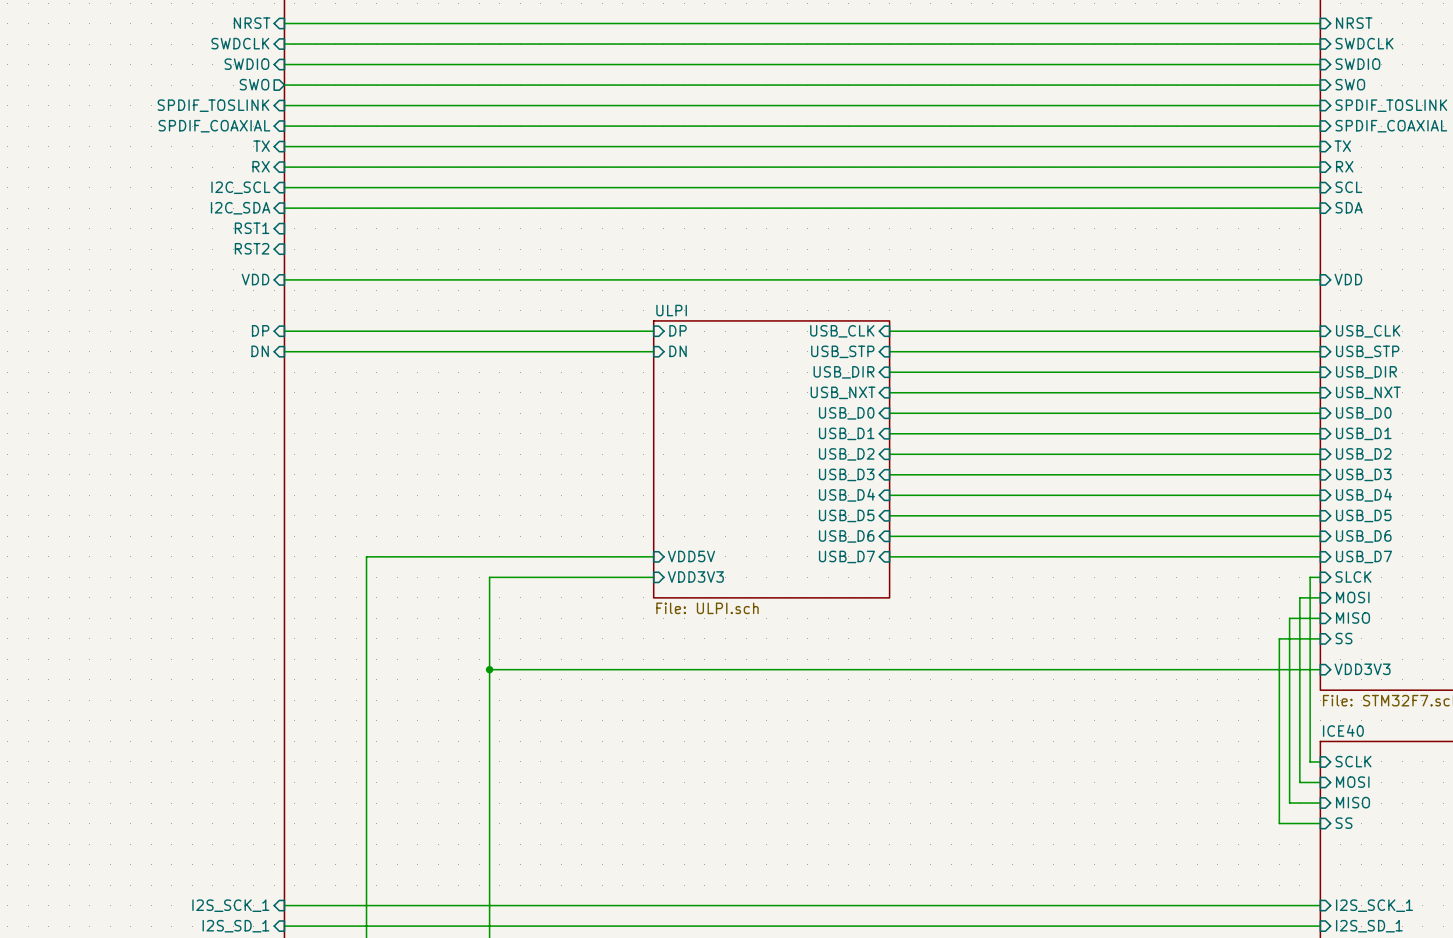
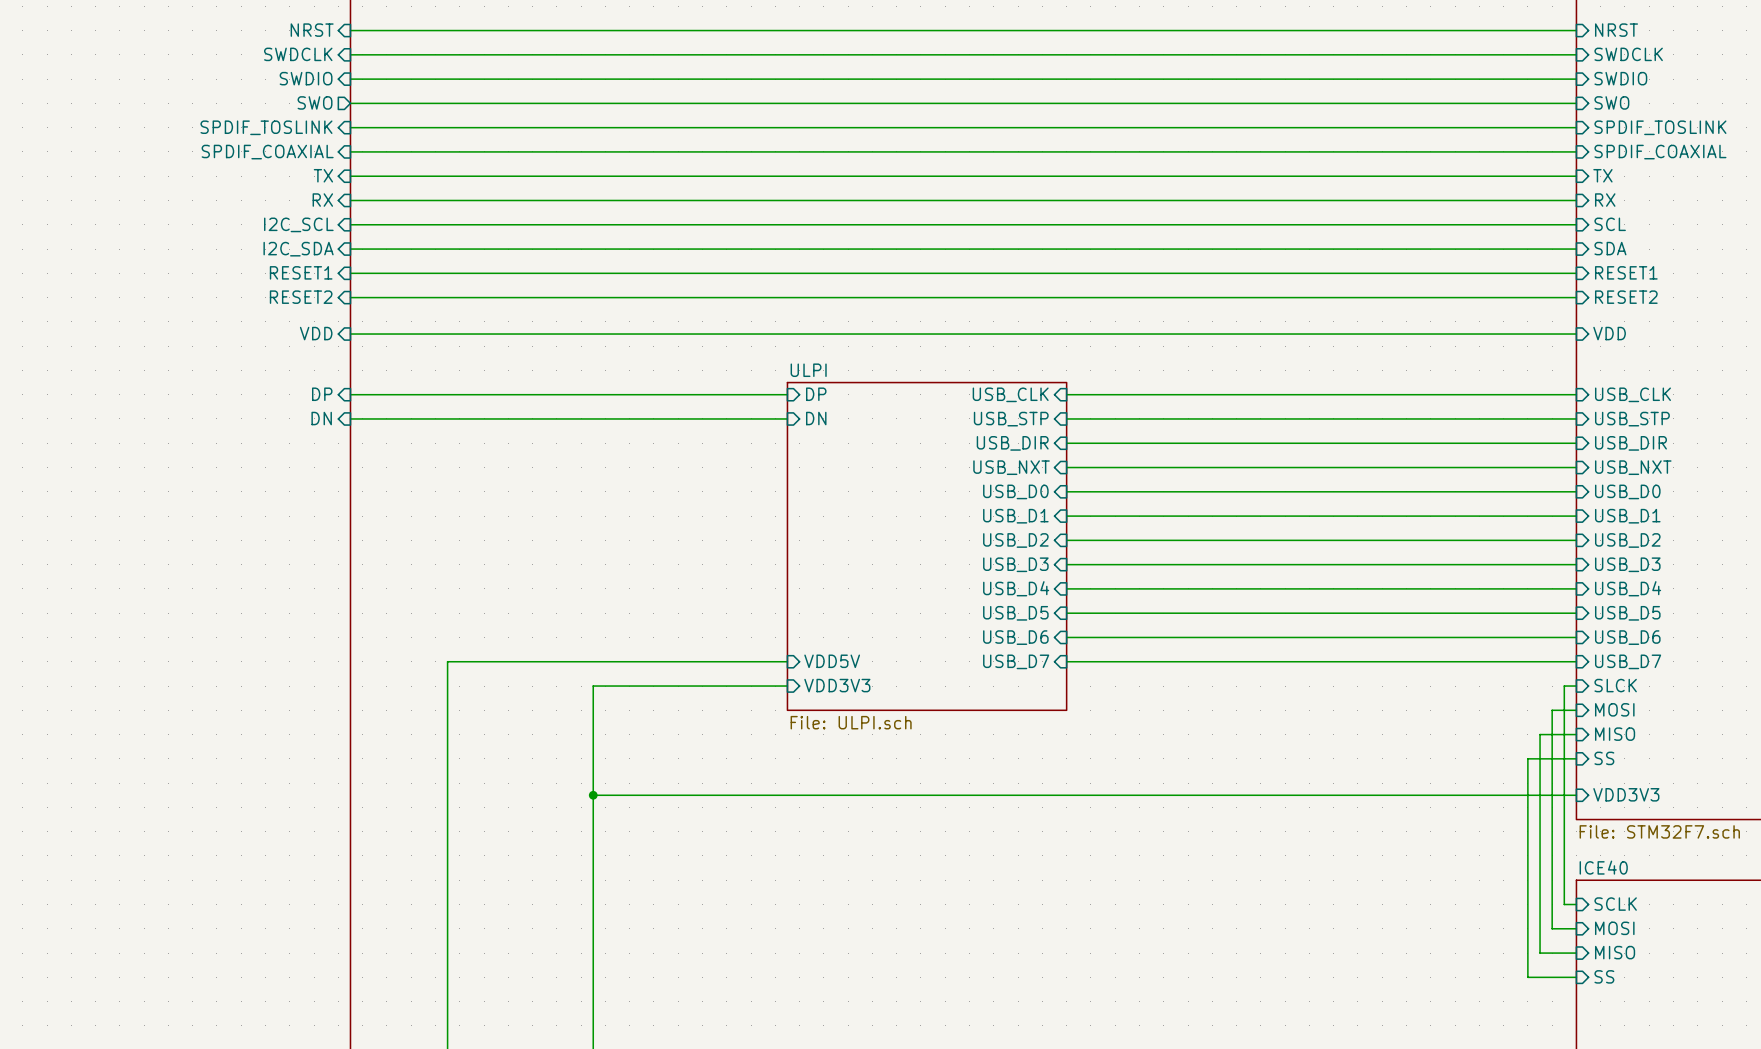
sheet pin: RST1 (252, 228) -> RESET1 (301, 272)
wire: none -> (350, 273) (1576, 273)
sheet pin: none -> RESET1 (1626, 272)
sheet pin: RST2 (252, 248) -> RESET2 (301, 297)
sheet pin: none -> RESET2 (1626, 297)
wire: none -> (350, 297) (1576, 297)

